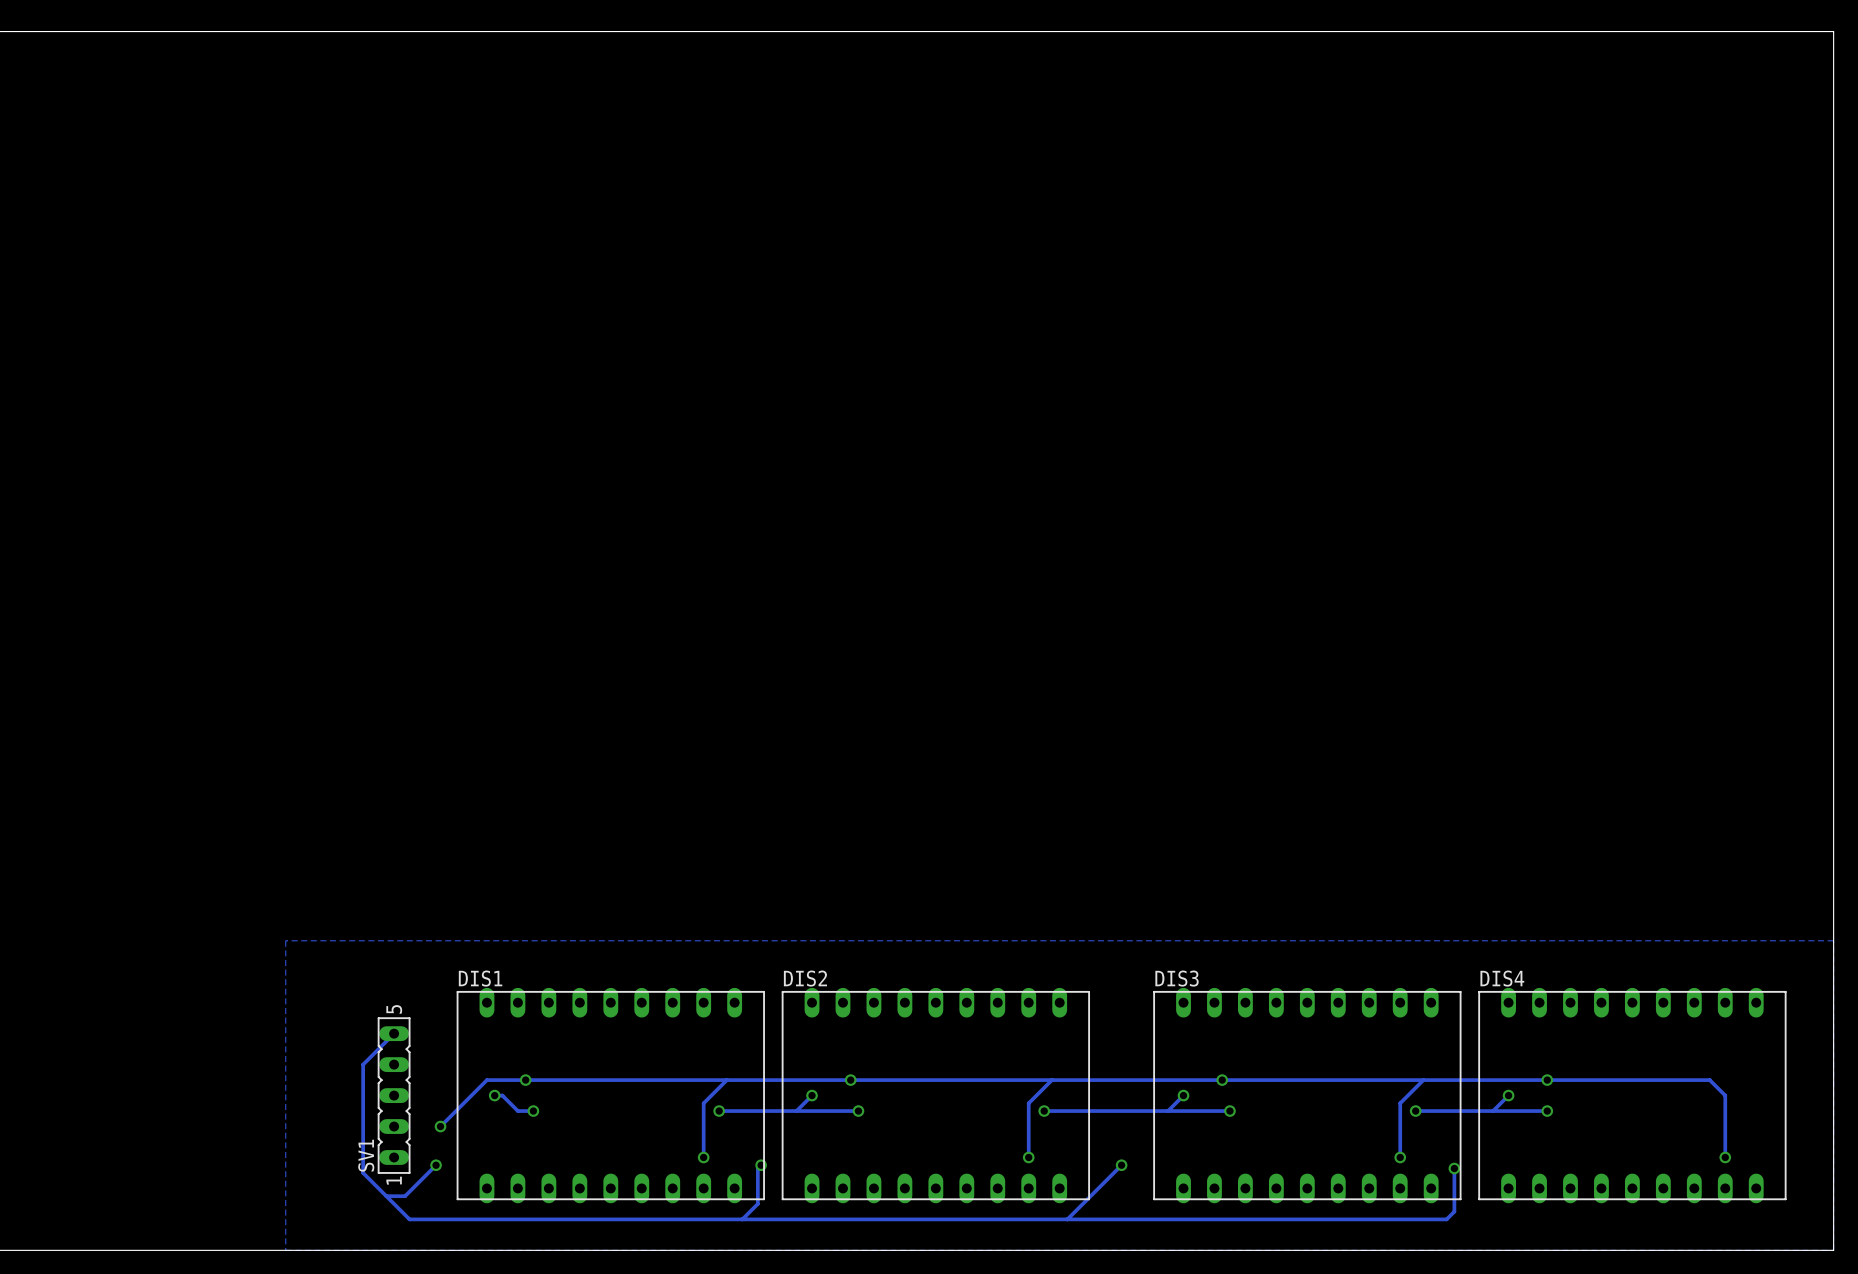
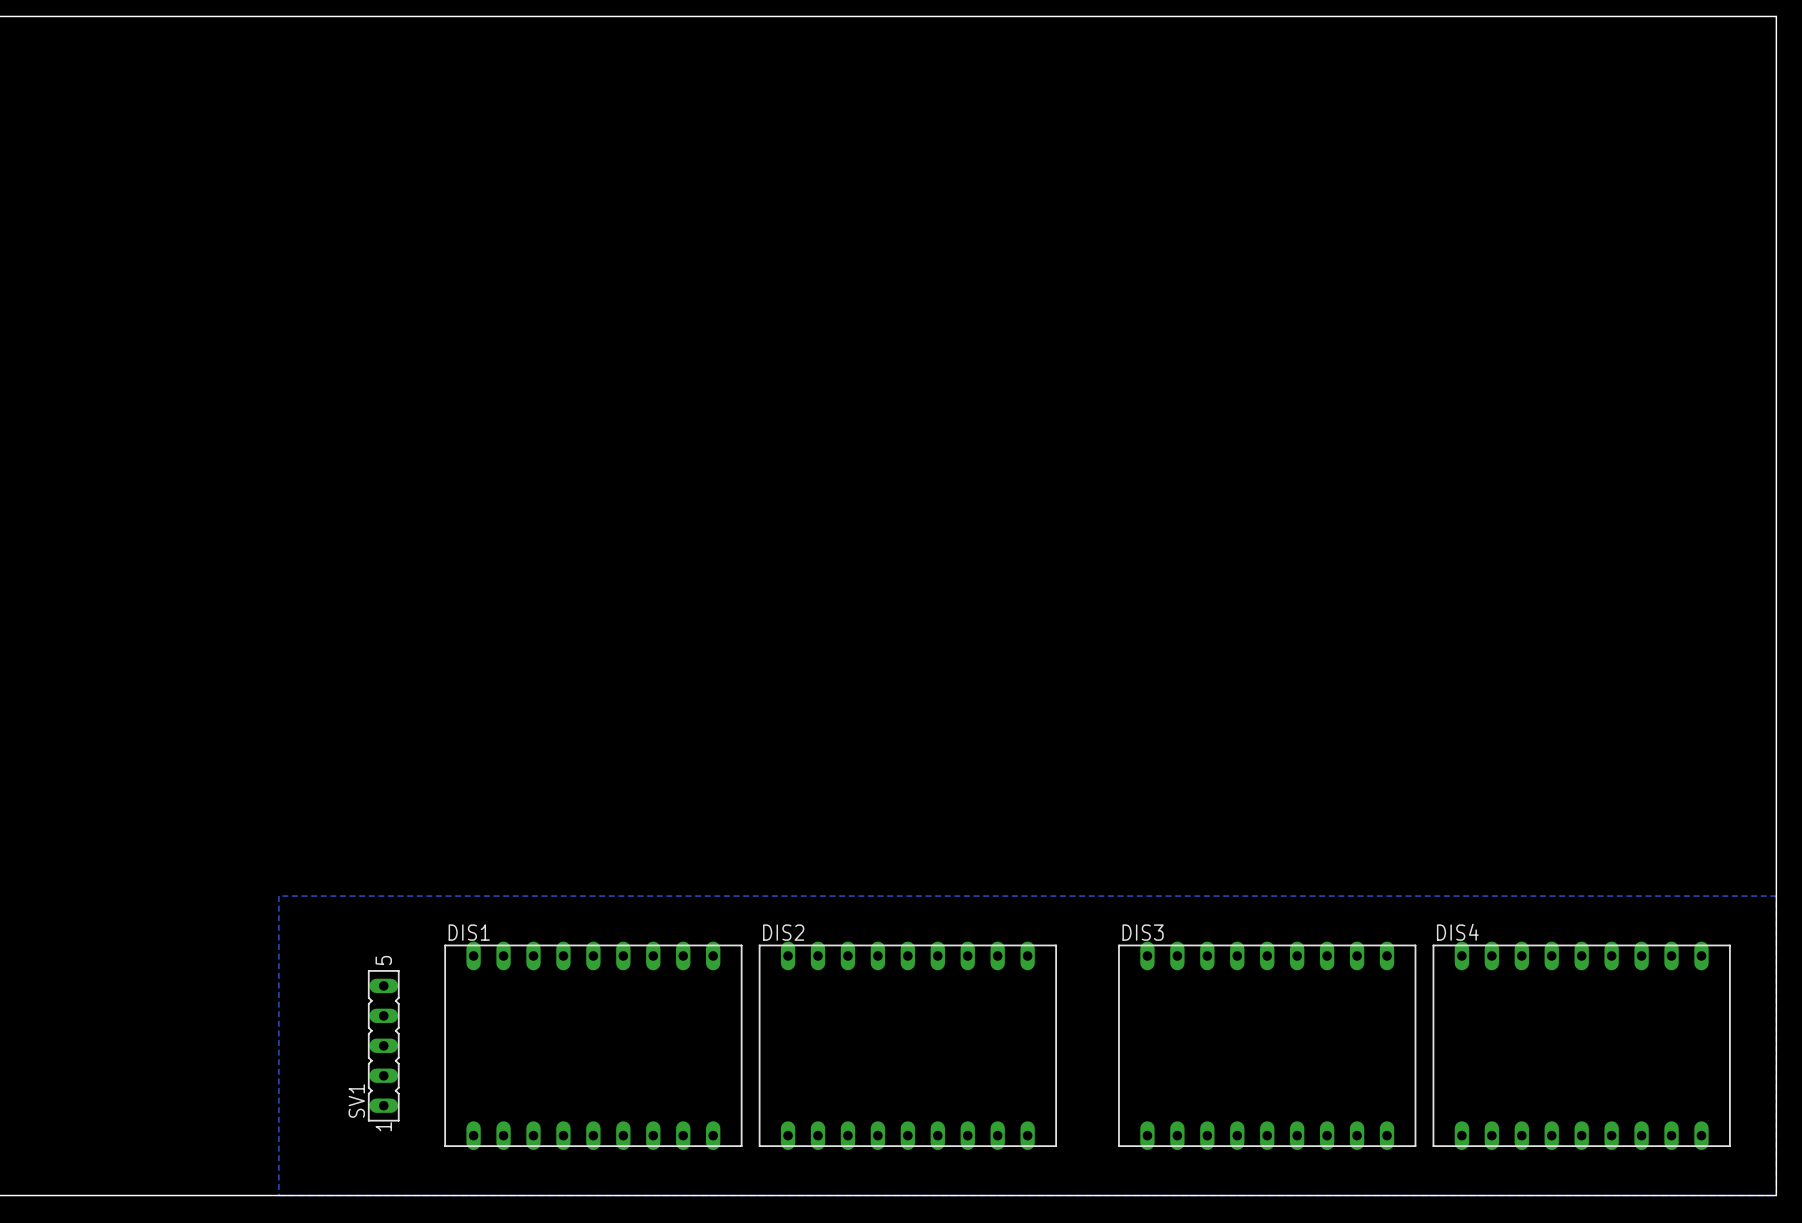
track: (394, 1033) (363, 1064) (363, 1172) (409, 1219) (1446, 1219) (1454, 1211) (1454, 1168) -> none
via: (525, 1080) -> none
track: (726, 1080) (703, 1103) (703, 1157) -> none
via: (850, 1080) -> none
track: (1051, 1080) (1028, 1103) (1028, 1157) -> none
via: (1222, 1080) -> none
track: (1423, 1080) (1400, 1103) (1400, 1157) -> none
via: (1547, 1080) -> none
track: (494, 1095) (502, 1095) (517, 1111) (533, 1111) -> none
via: (494, 1095) -> none
track: (812, 1095) (796, 1111) -> none
via: (812, 1095) -> none
track: (1183, 1095) (1168, 1111) -> none
via: (1183, 1095) -> none
track: (1508, 1095) (1493, 1111) -> none
via: (1508, 1095) -> none
via: (533, 1111) -> none
via: (719, 1111) -> none
track: (858, 1111) (719, 1111) -> none
via: (858, 1111) -> none
via: (1044, 1111) -> none
track: (1229, 1111) (1044, 1111) -> none
via: (1229, 1111) -> none
via: (1415, 1111) -> none
track: (1547, 1111) (1415, 1111) -> none
via: (1547, 1111) -> none
track: (440, 1126) (486, 1080) (1709, 1080) (1725, 1095) (1725, 1157) -> none
via: (440, 1126) -> none
via: (703, 1157) -> none
via: (1028, 1157) -> none
via: (1400, 1157) -> none
via: (1725, 1157) -> none
track: (436, 1165) (405, 1196) (386, 1196) -> none
via: (436, 1165) -> none
track: (761, 1165) (757, 1168) (757, 1203) (742, 1219) -> none
via: (761, 1165) -> none
track: (1121, 1165) (1067, 1219) -> none
via: (1121, 1165) -> none
via: (1454, 1168) -> none

